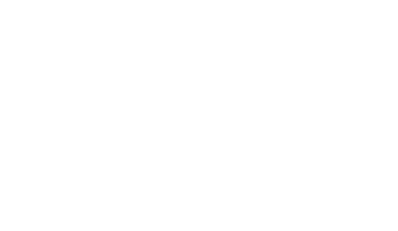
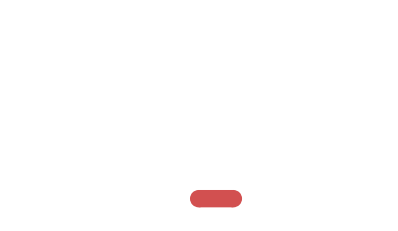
part: none -> (216, 198)

